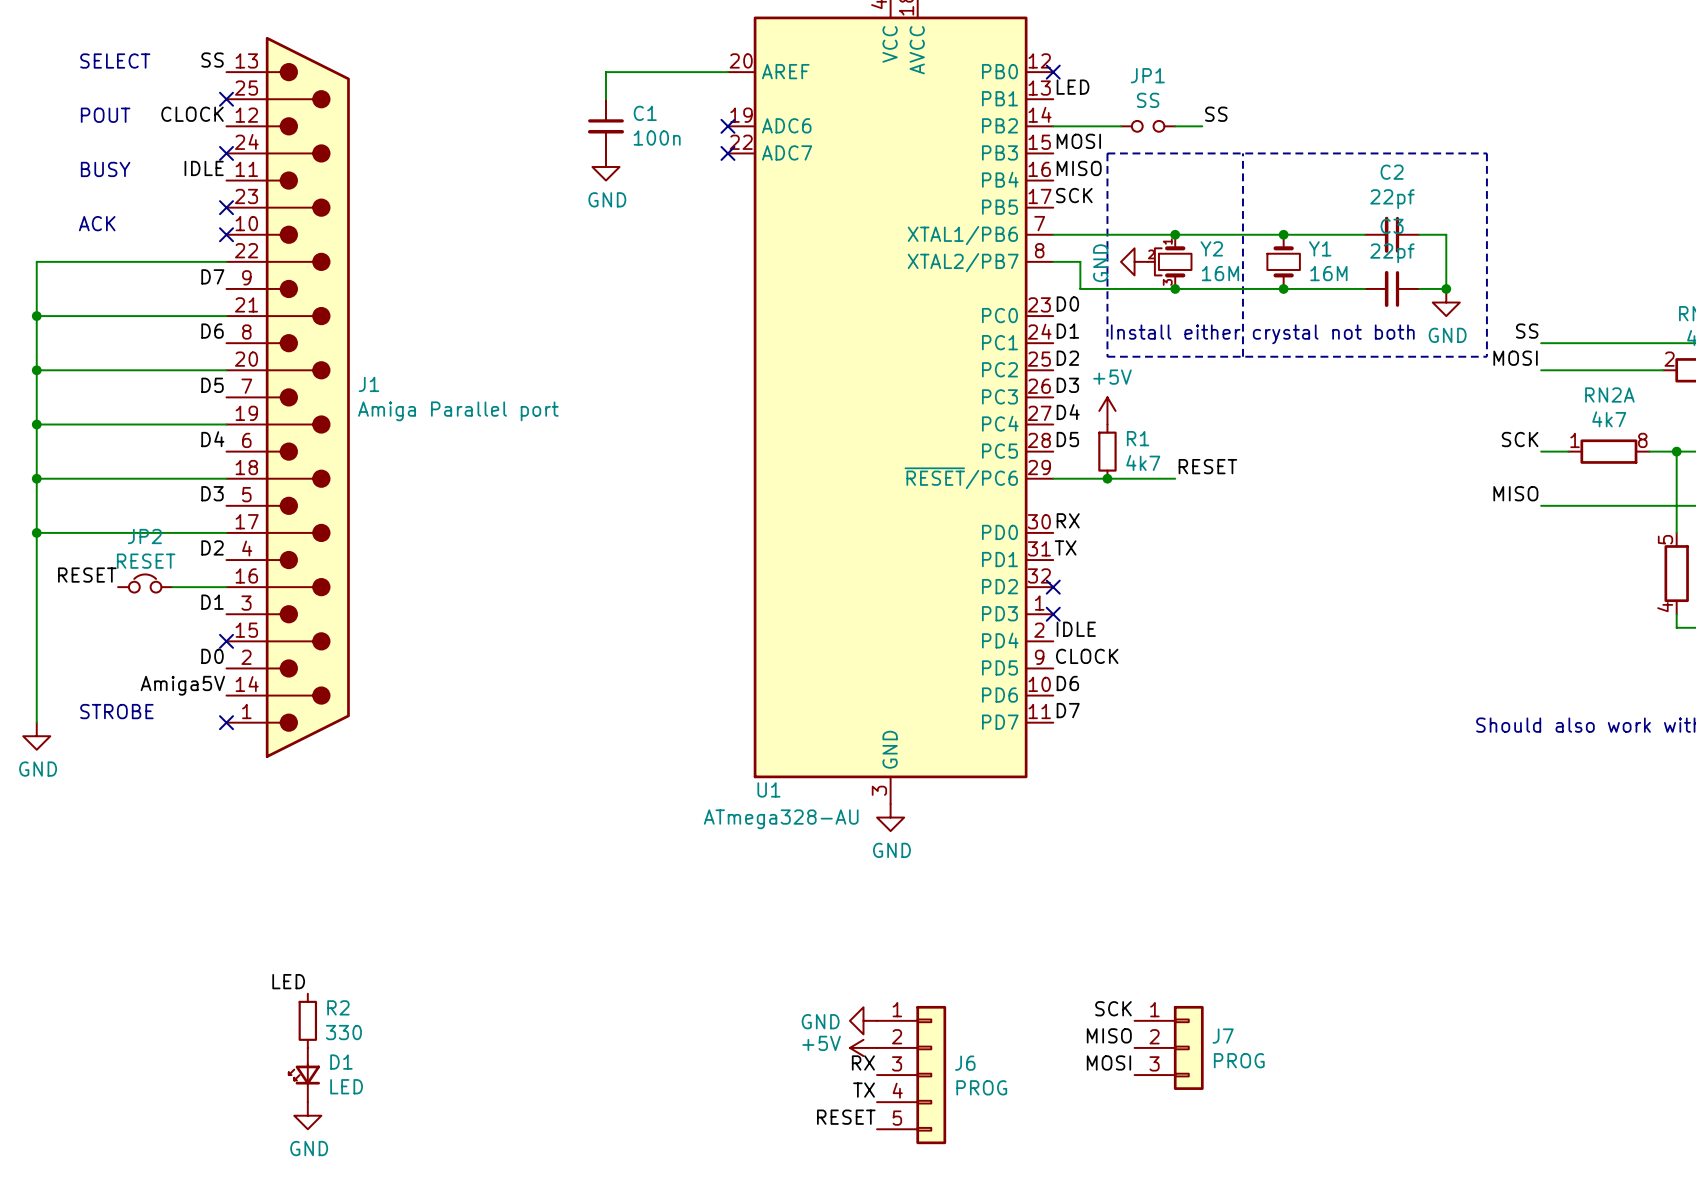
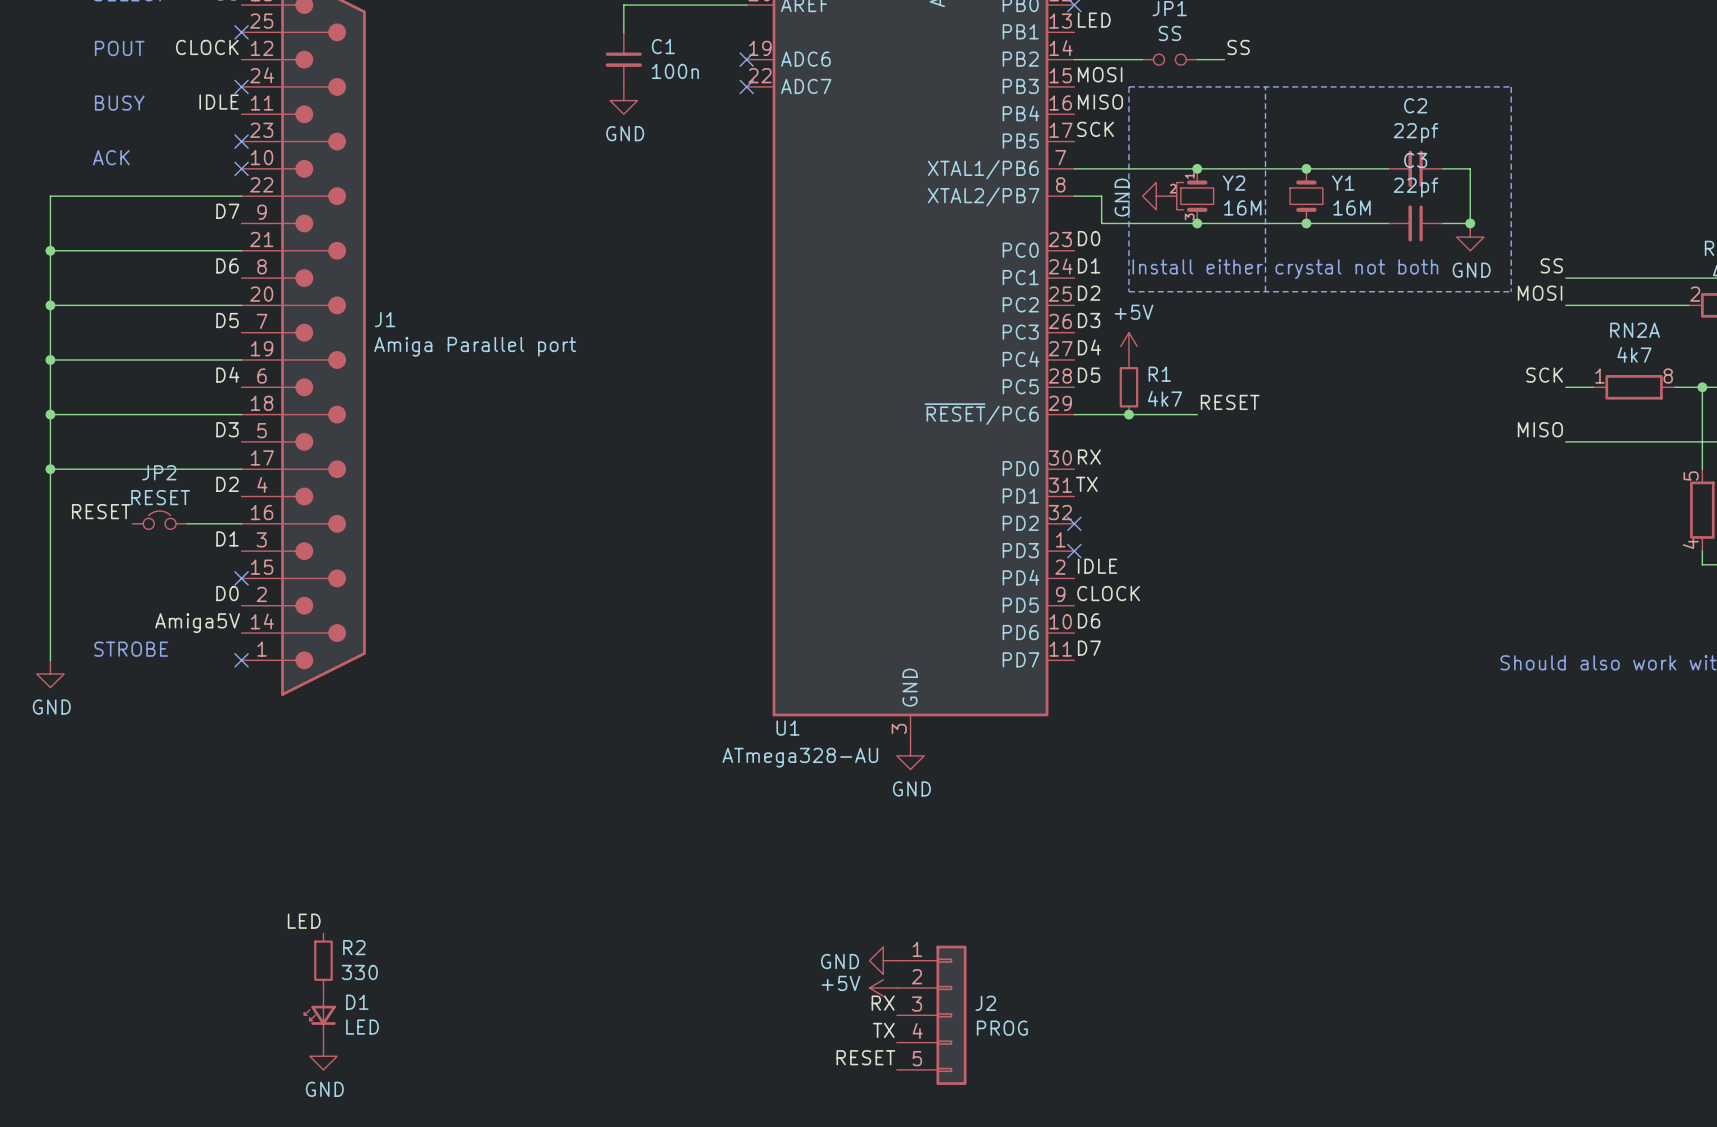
label: SCK (1113, 1008) -> none
label: MISO (1109, 1035) -> none
J7: PROG (1169, 1047) -> none
label: MOSI (1108, 1062) -> none
J6 name: J6 (965, 1063) -> J2 (985, 1003)

